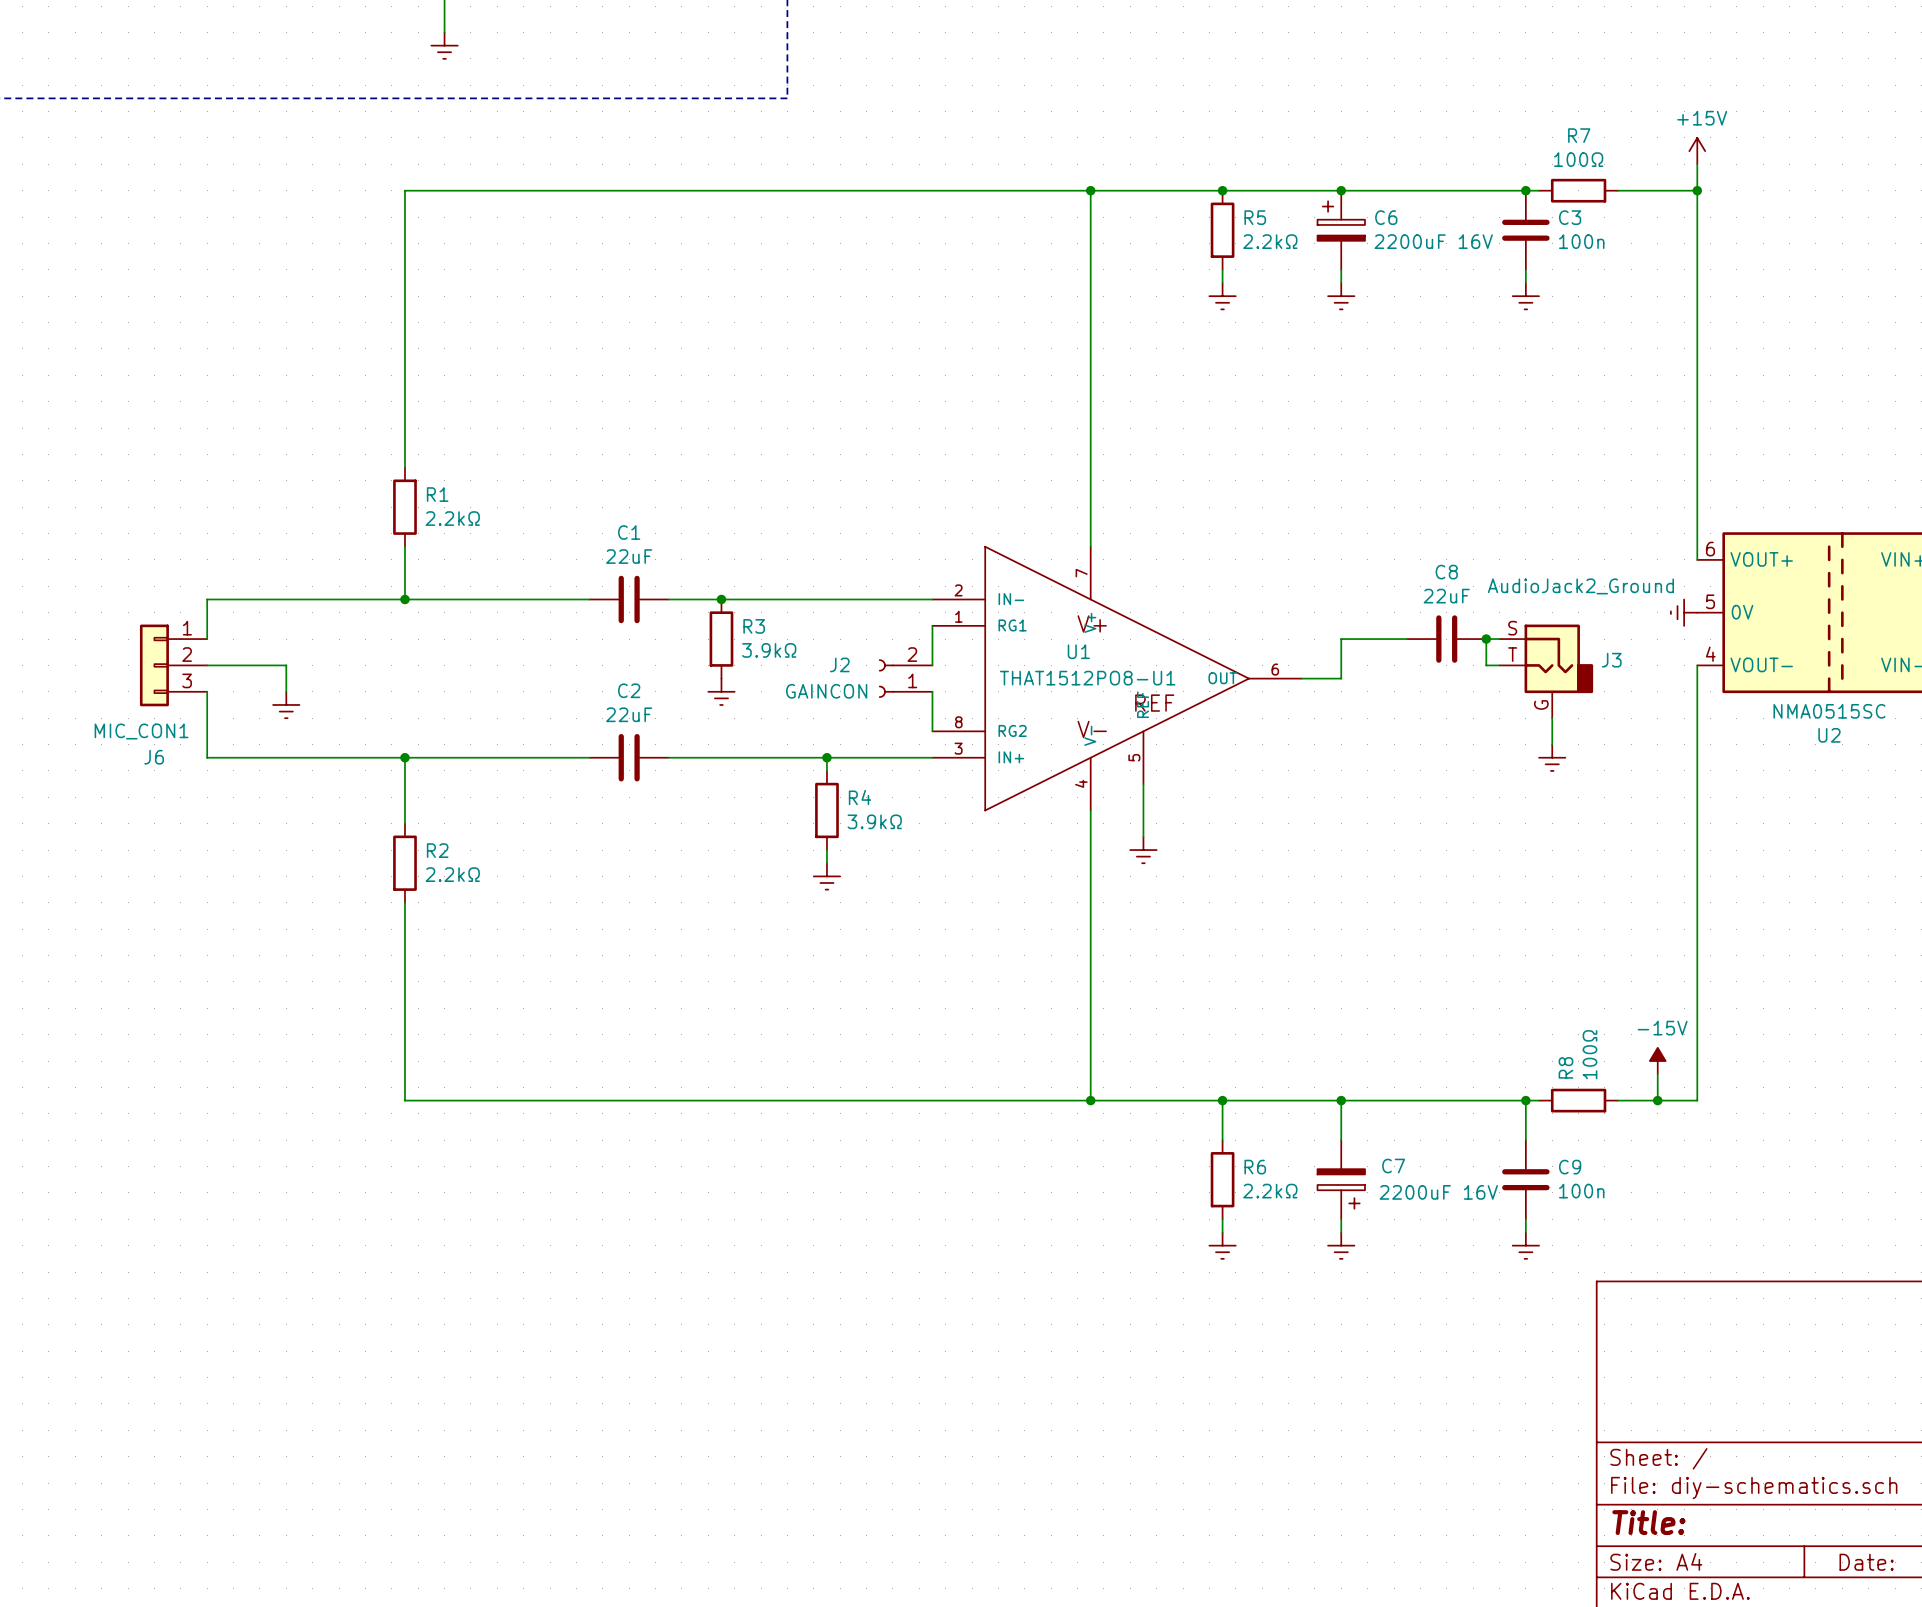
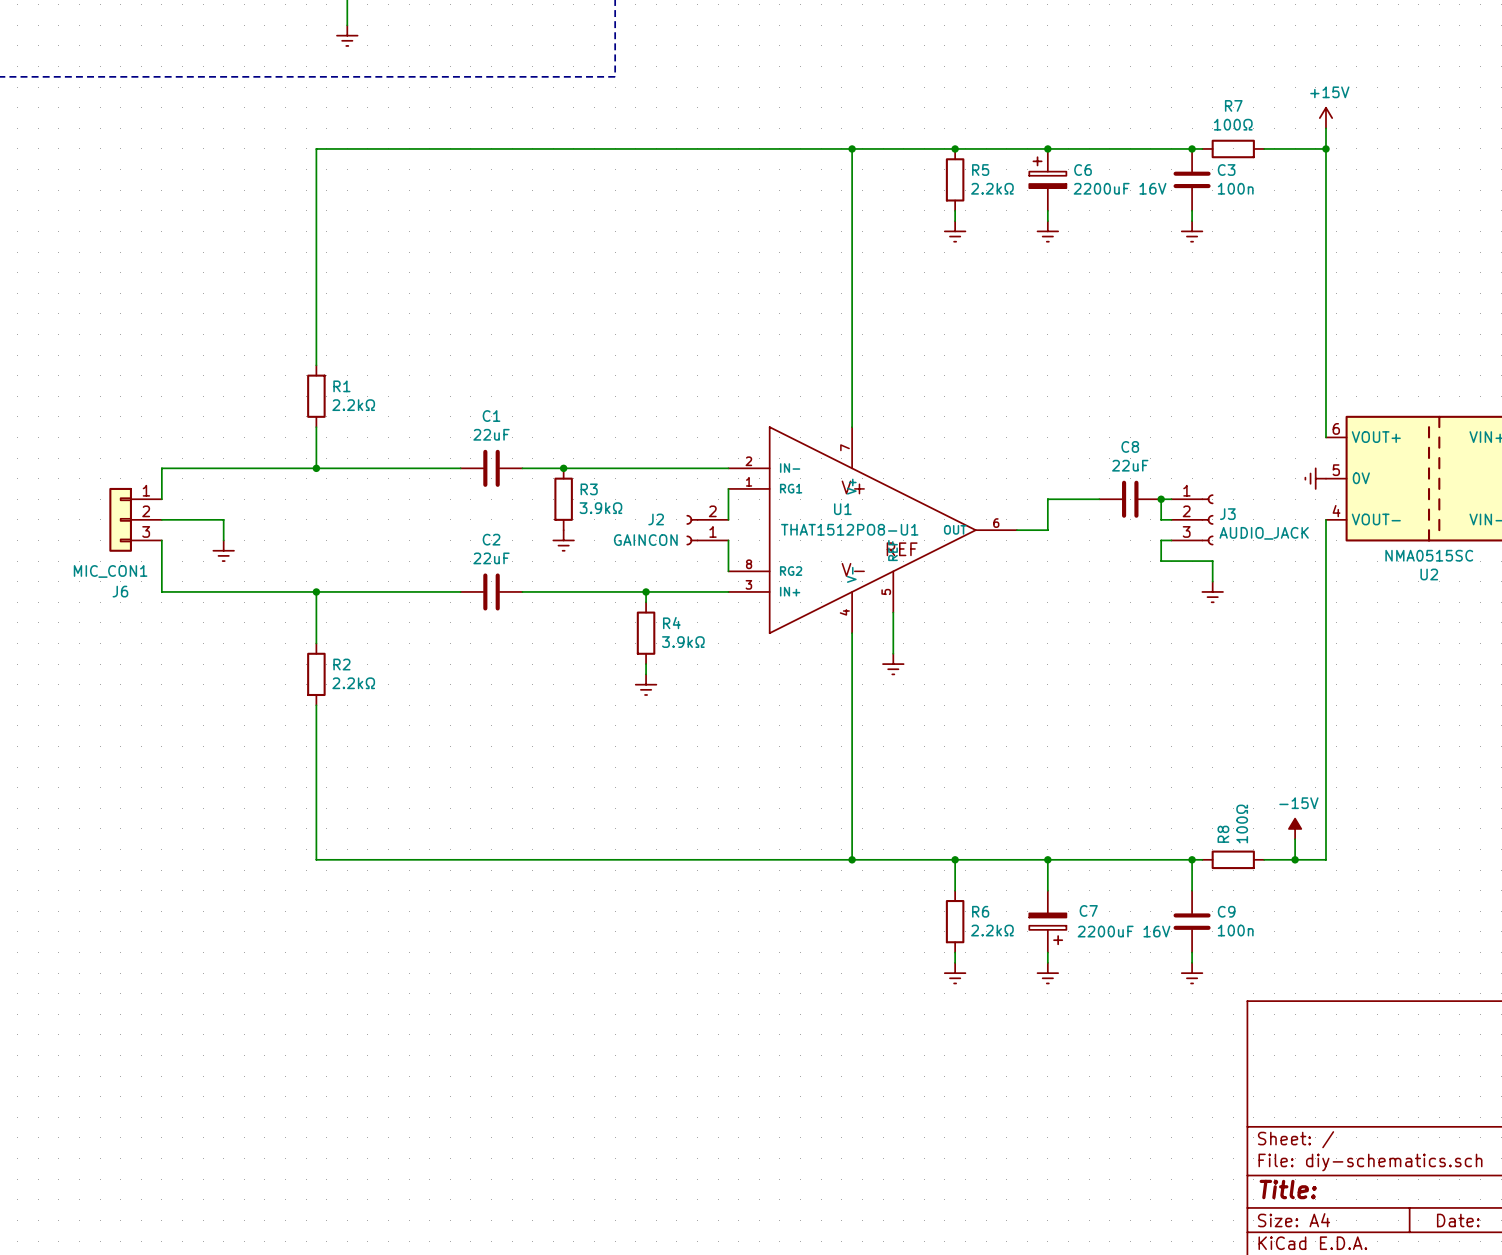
J3 value: AudioJack2_Ground (1580, 586) -> AUDIO_JACK (1264, 533)
J3 symbol: [1499, 624, 1594, 719] -> [1171, 494, 1214, 546]
wire: none -> (1171, 540) (1161, 540) (1161, 561) (1212, 561)

